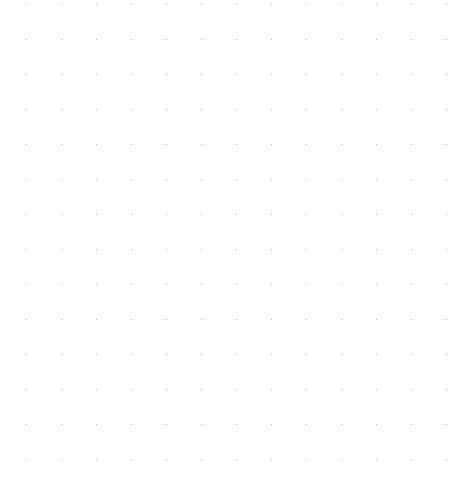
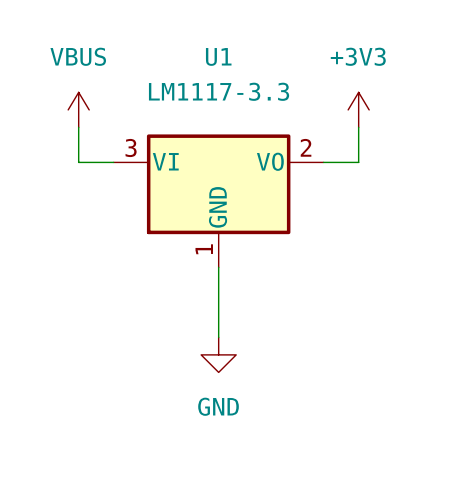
power symbol: none -> VBUS (78, 109)
power symbol: none -> +3V3 (358, 109)
wire: none -> (78, 127) (78, 162) (113, 162)
wire: none -> (358, 127) (358, 162) (323, 162)
U1: none -> LM1117-3.3 (218, 200)
wire: none -> (218, 267) (218, 337)
power symbol: none -> GND (218, 354)

